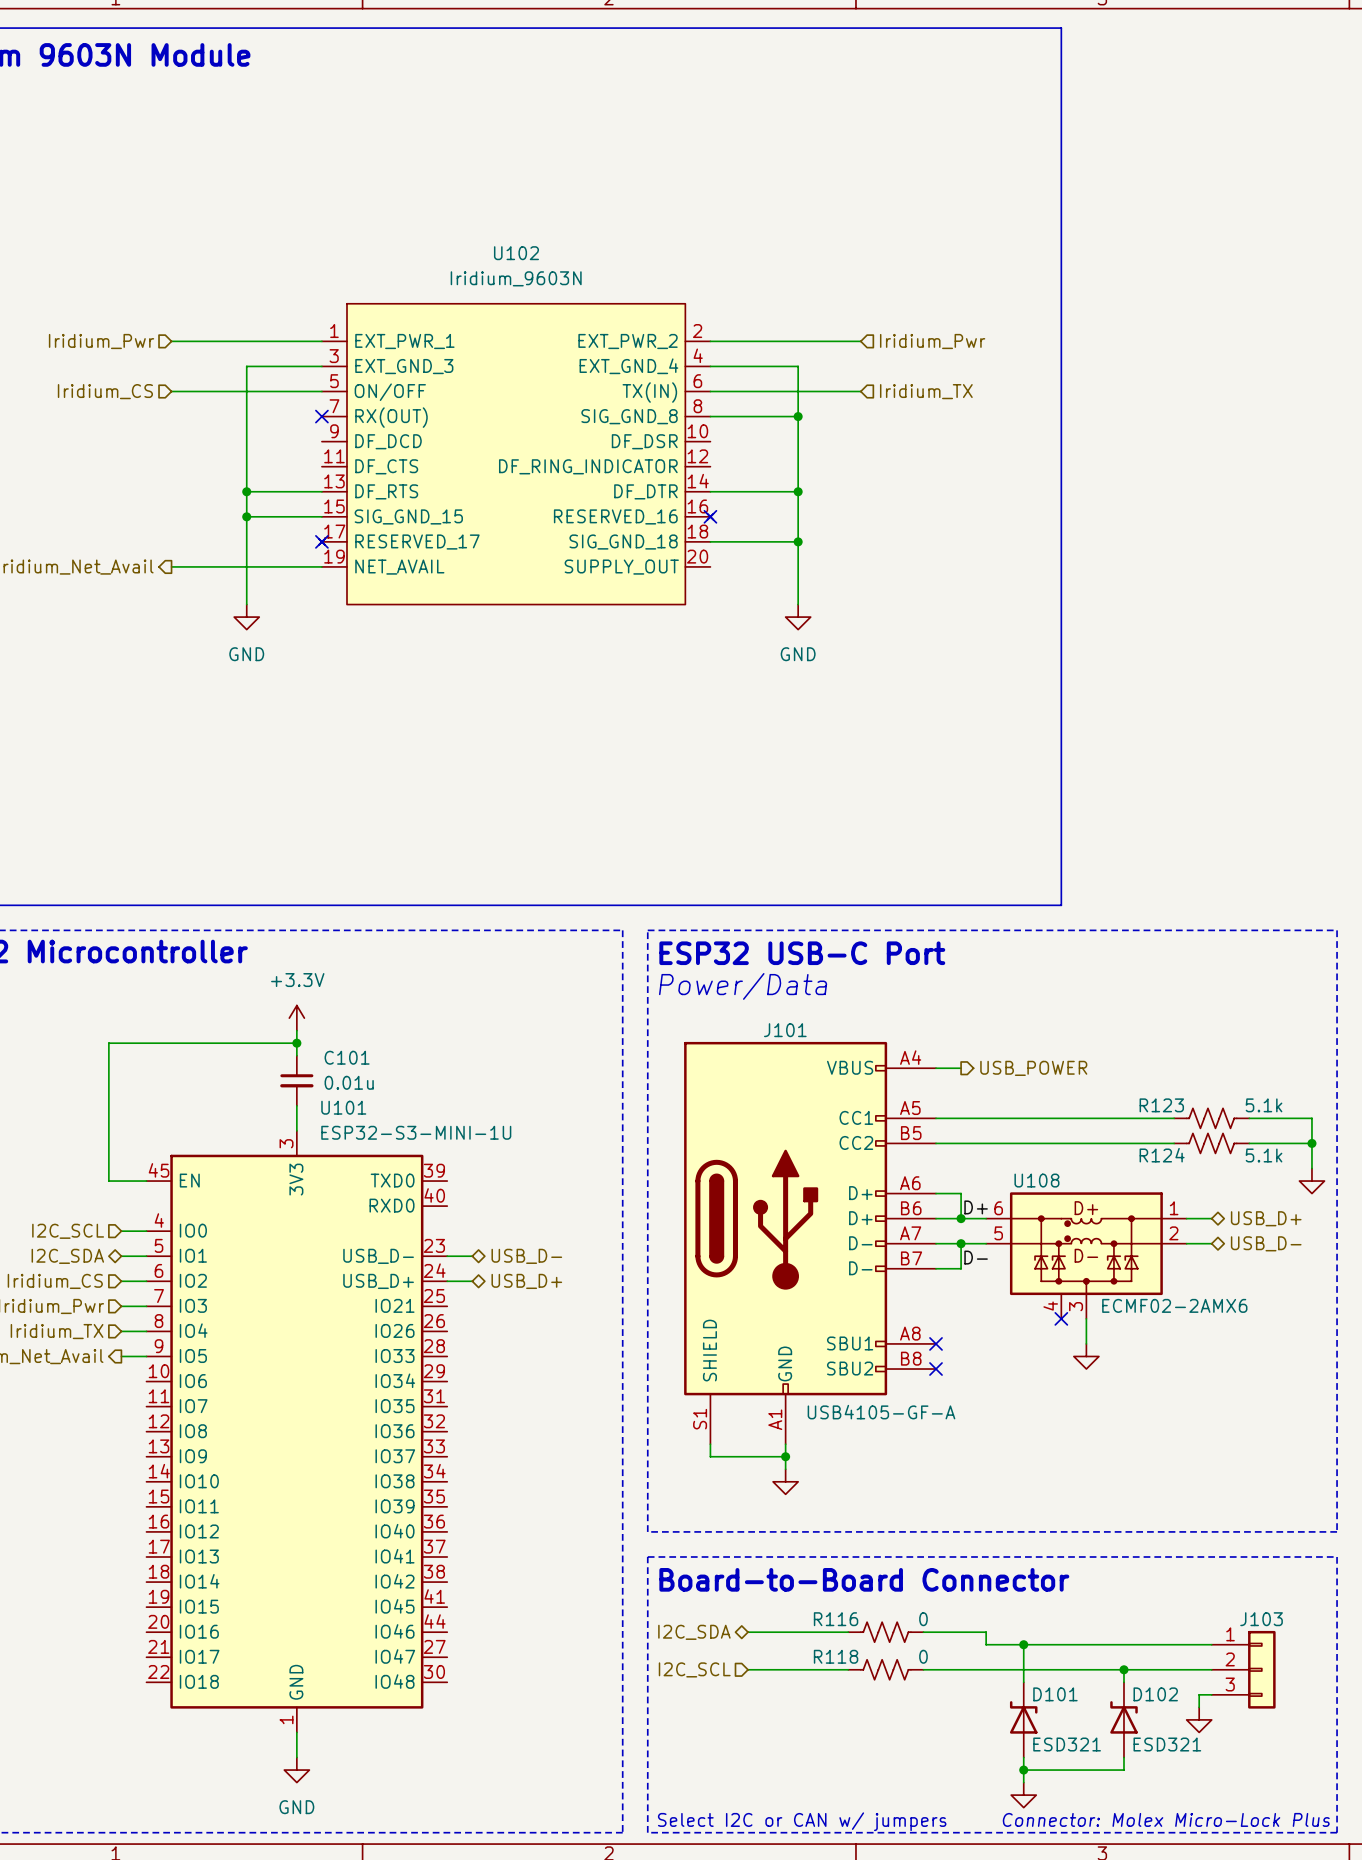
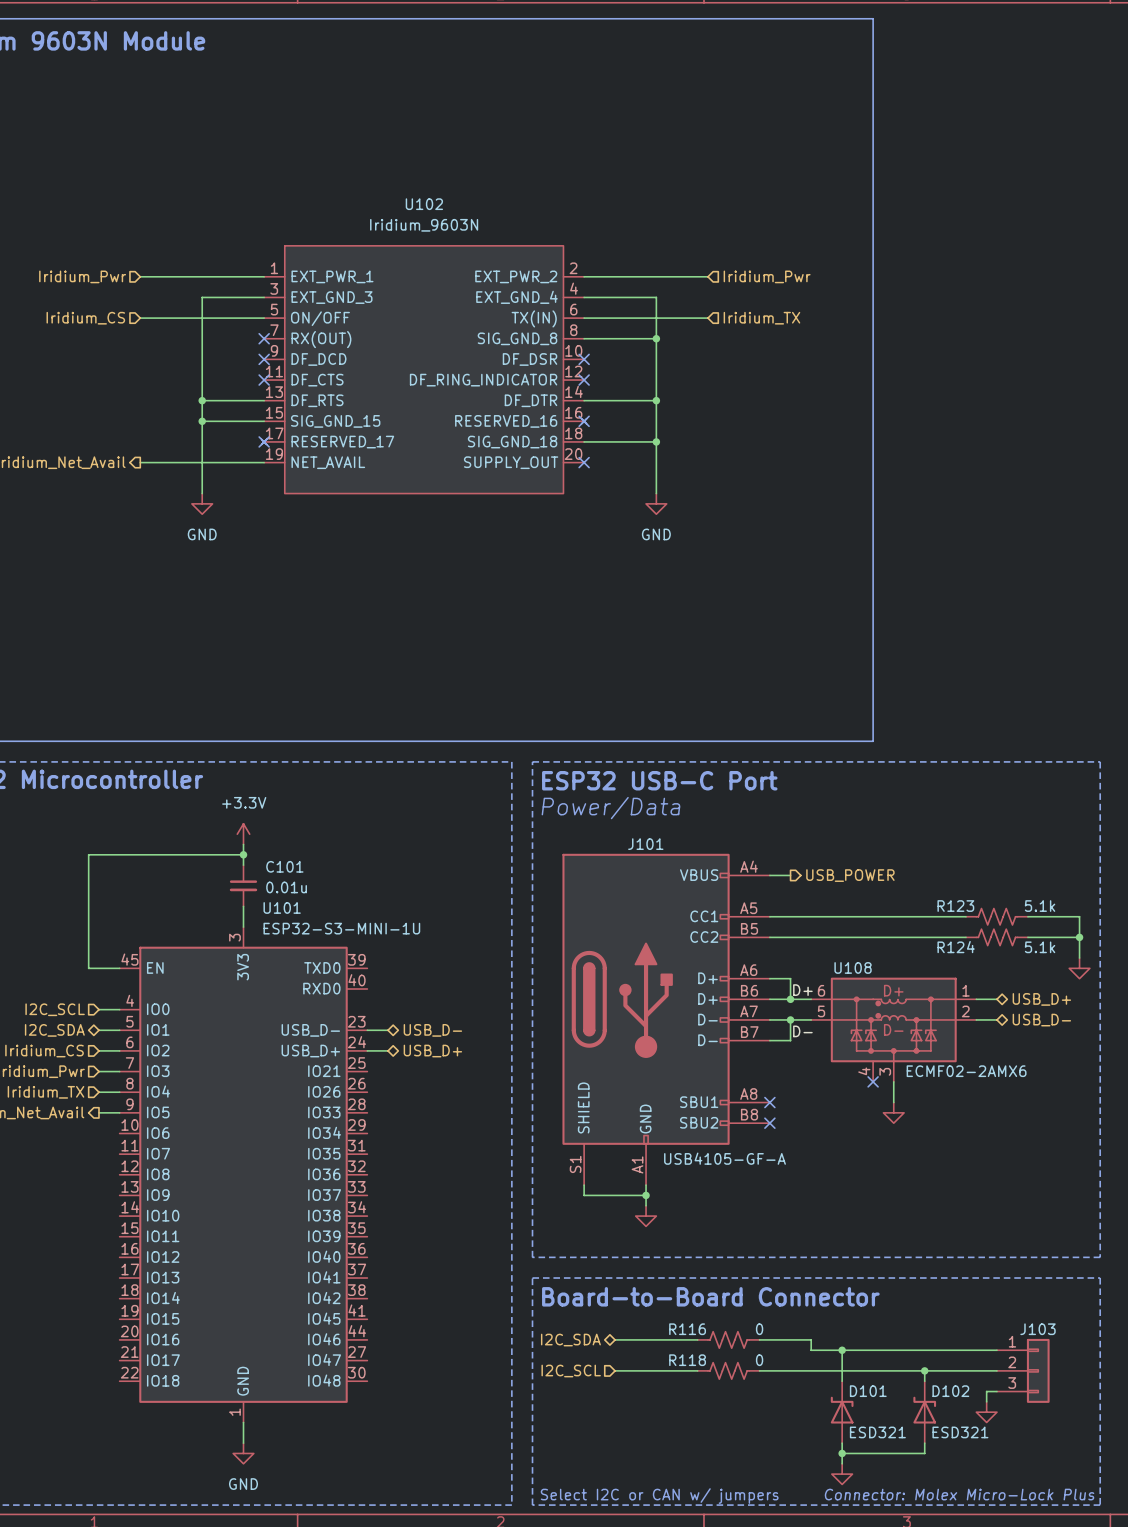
no-connect mark: none -> (264, 359)
no-connect mark: none -> (584, 359)
no-connect mark: none -> (264, 380)
no-connect mark: none -> (584, 380)
no-connect mark: none -> (584, 462)

